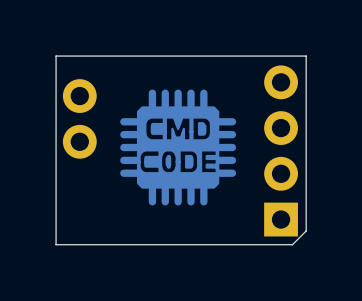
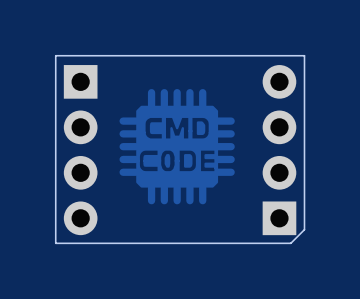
part: (79, 118) -> none
part: none -> (80, 150)

